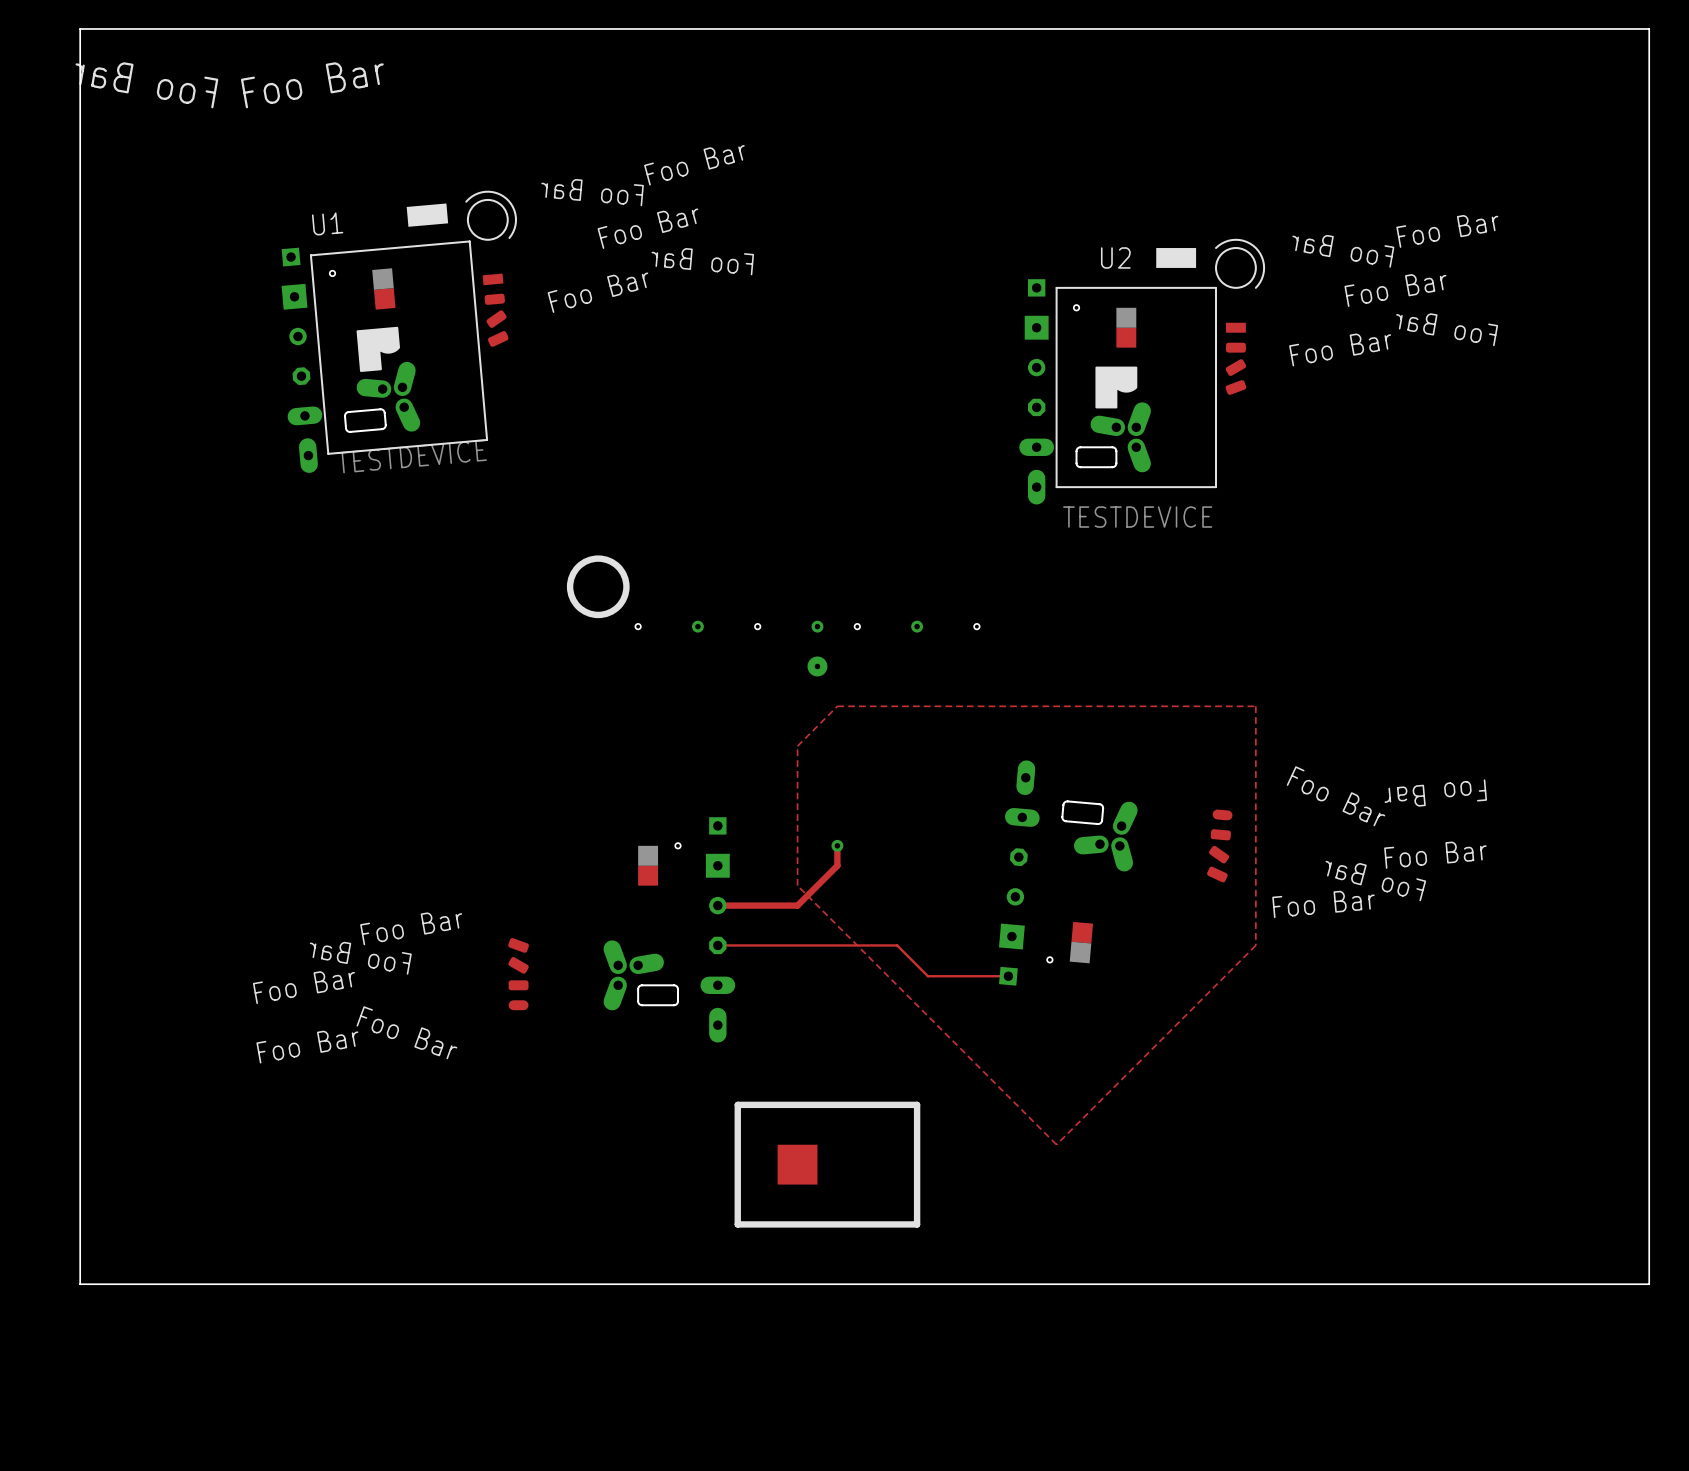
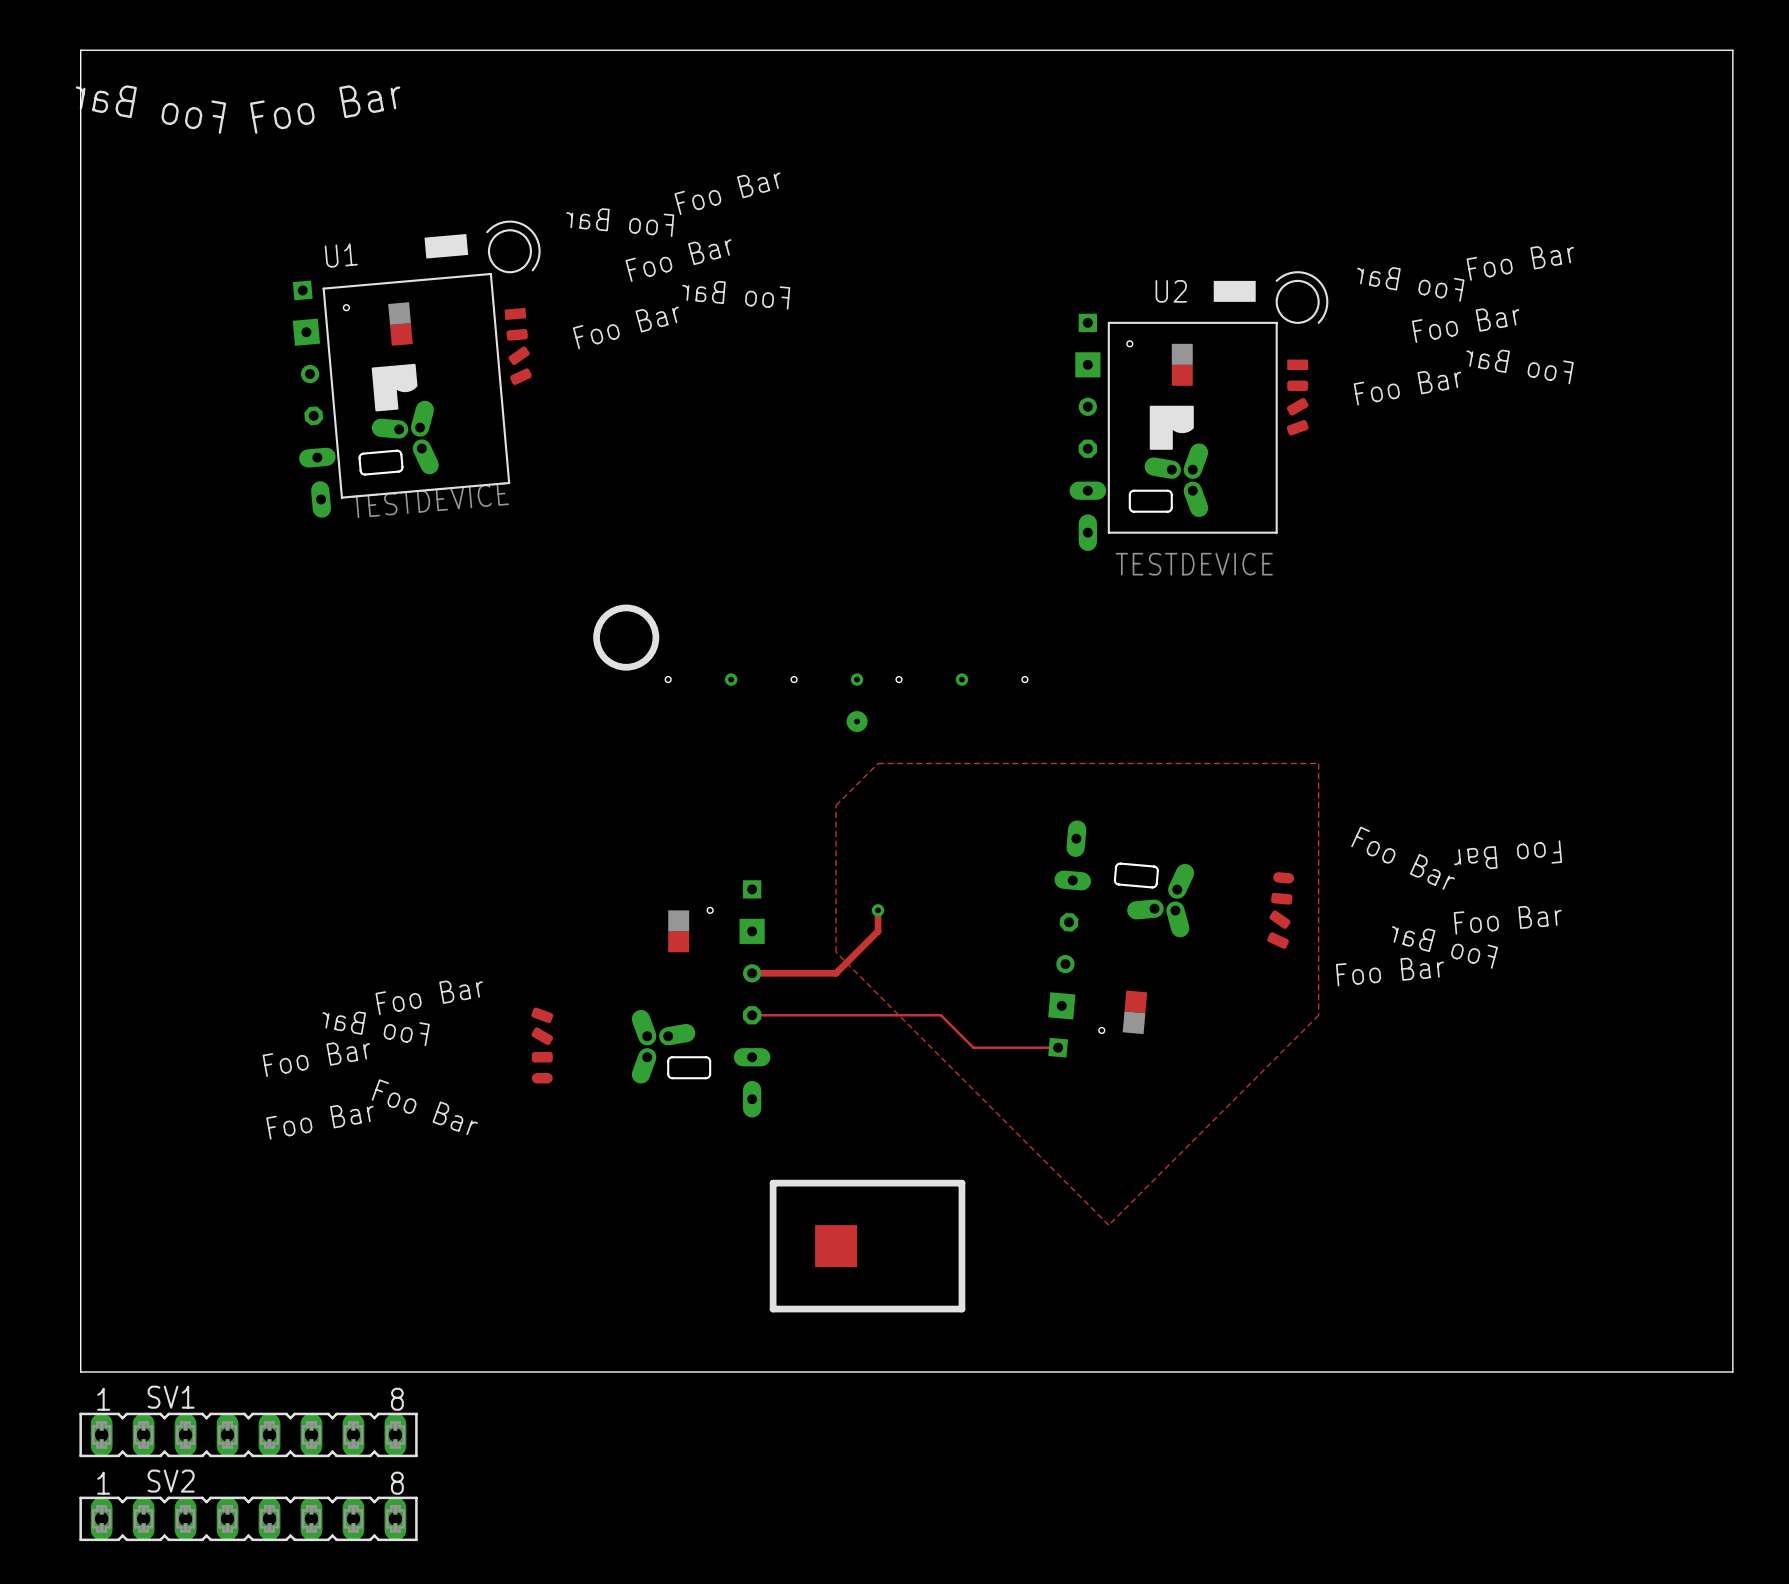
SV1: none -> (248, 1434)
SV2: none -> (248, 1518)

